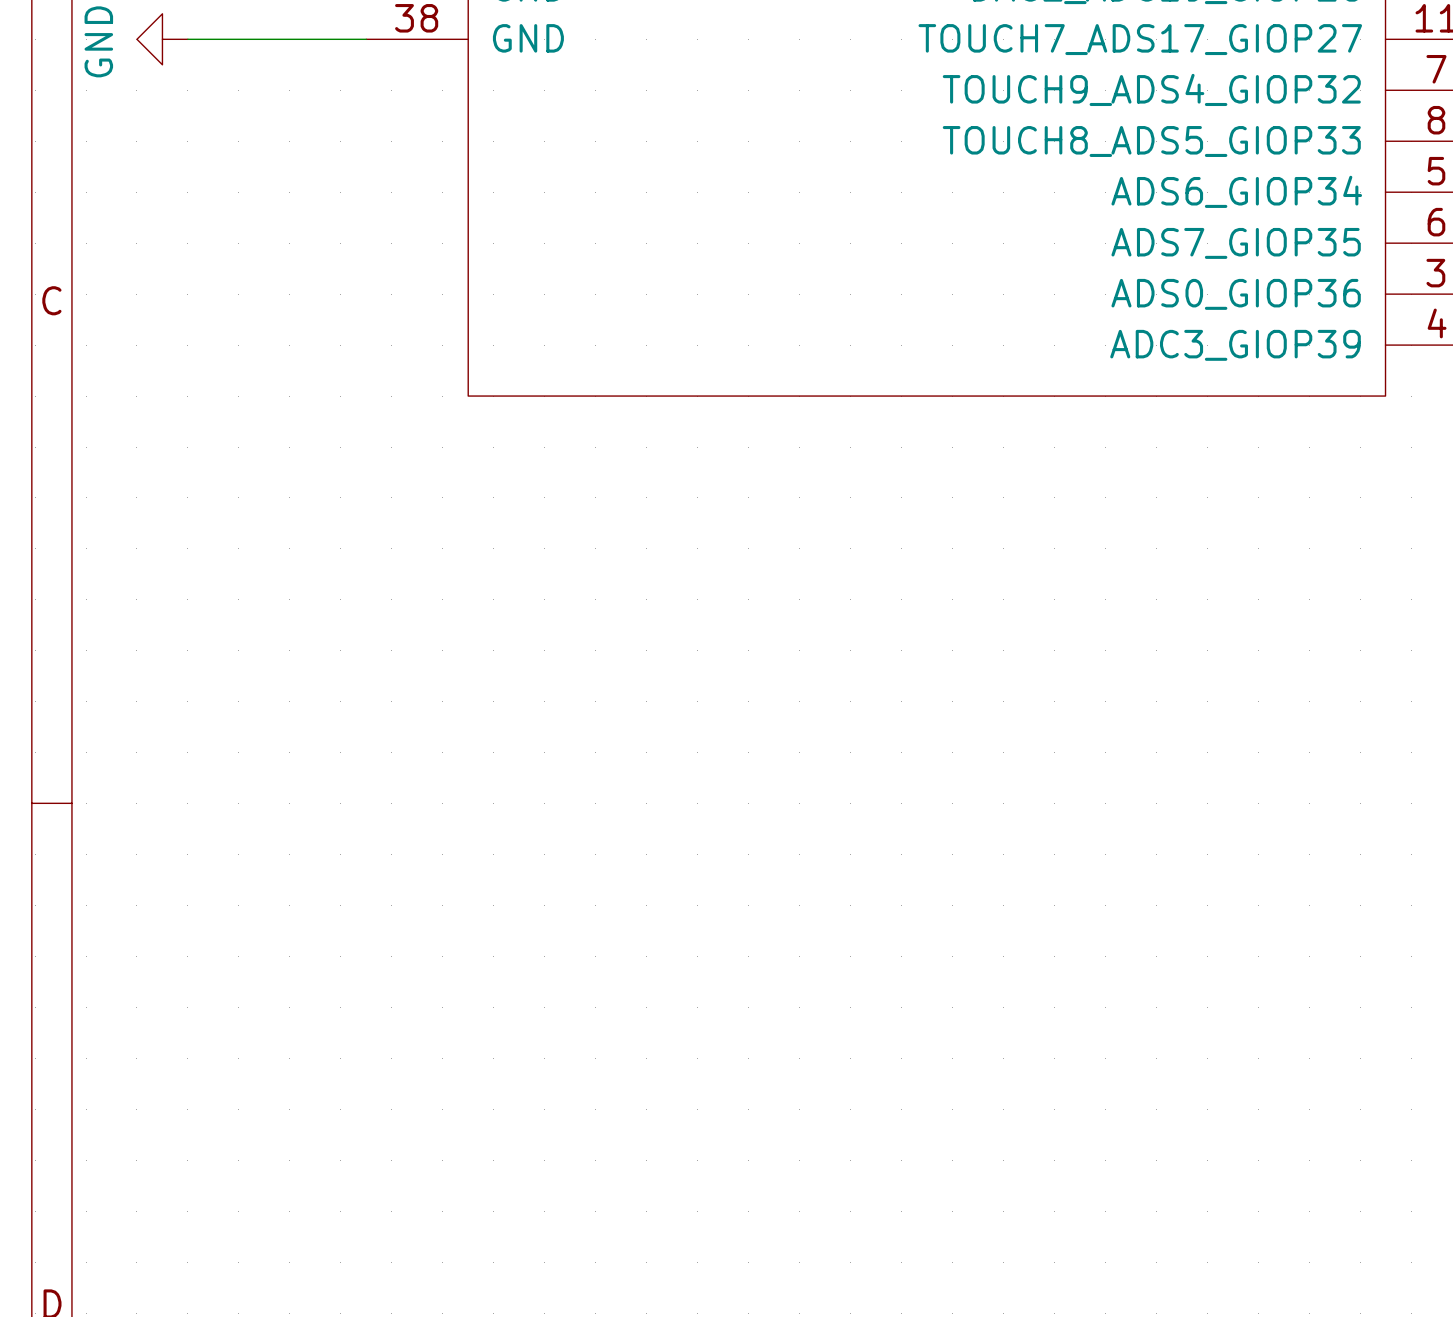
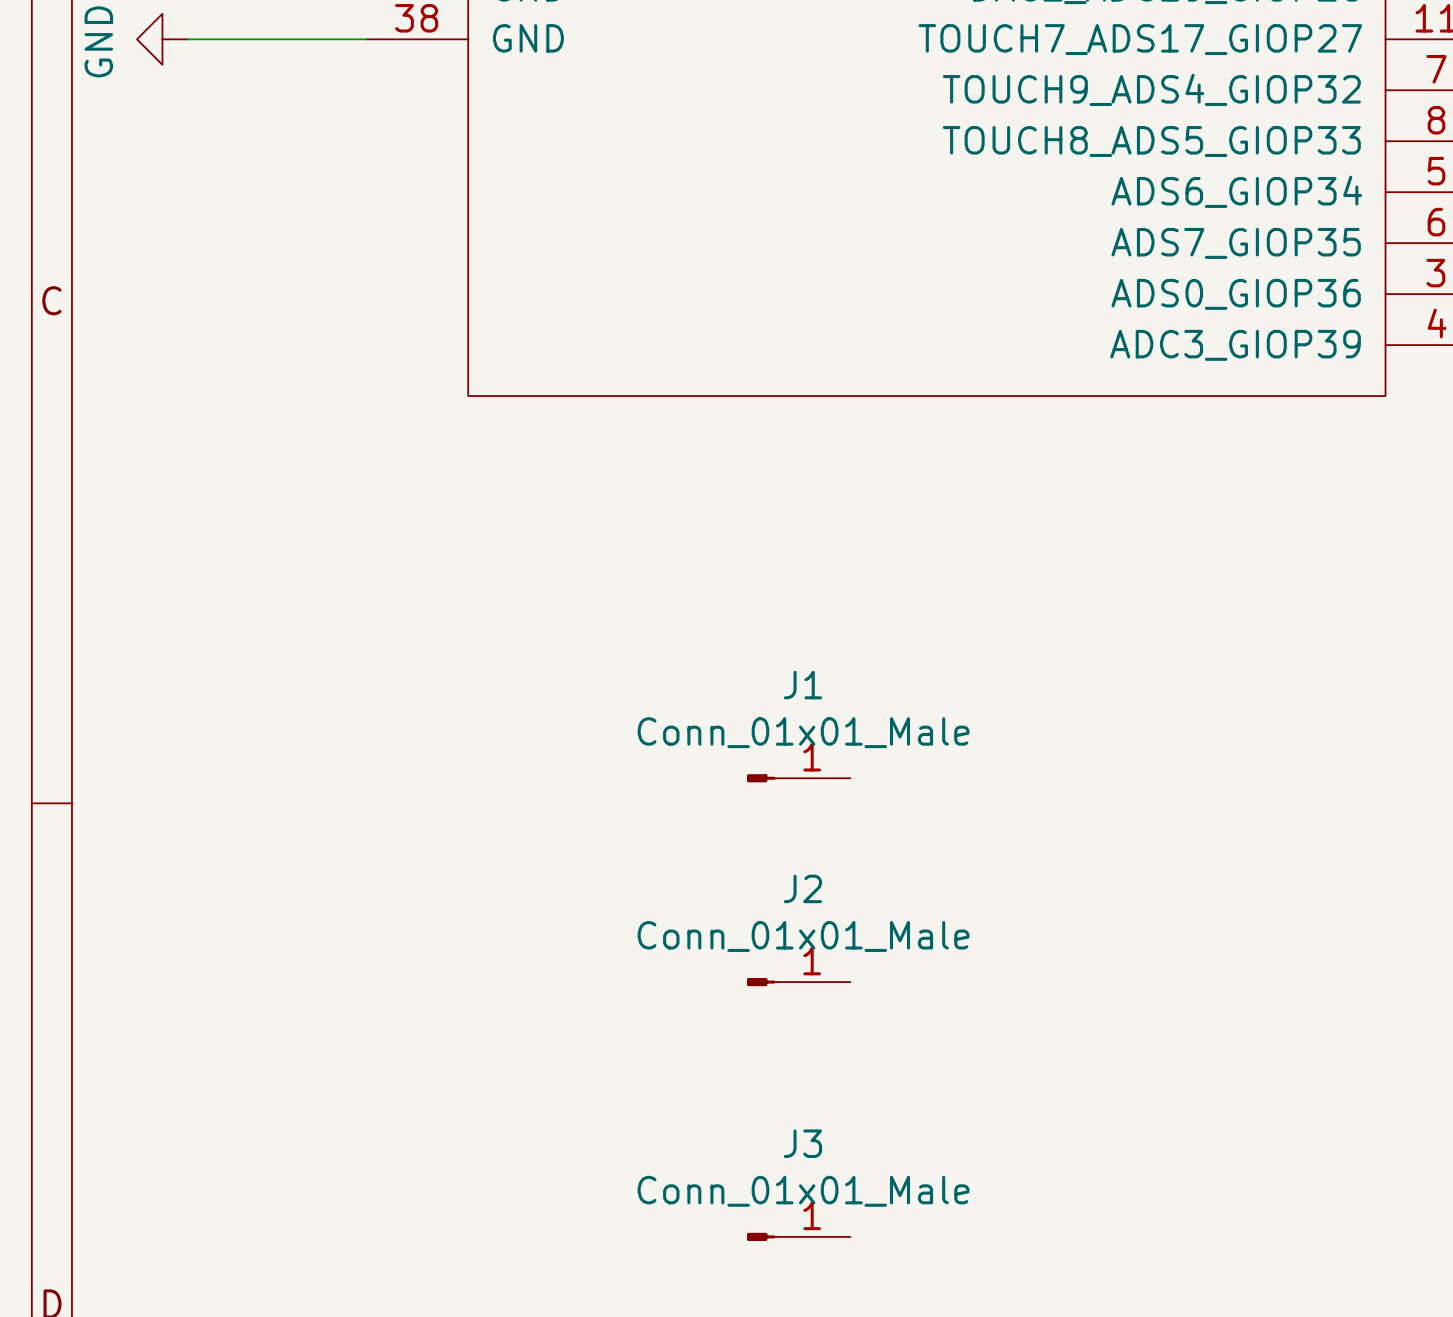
J1: none -> Conn_01x01_Male (798, 778)
J2: none -> Conn_01x01_Male (798, 982)
J3: none -> Conn_01x01_Male (798, 1236)

